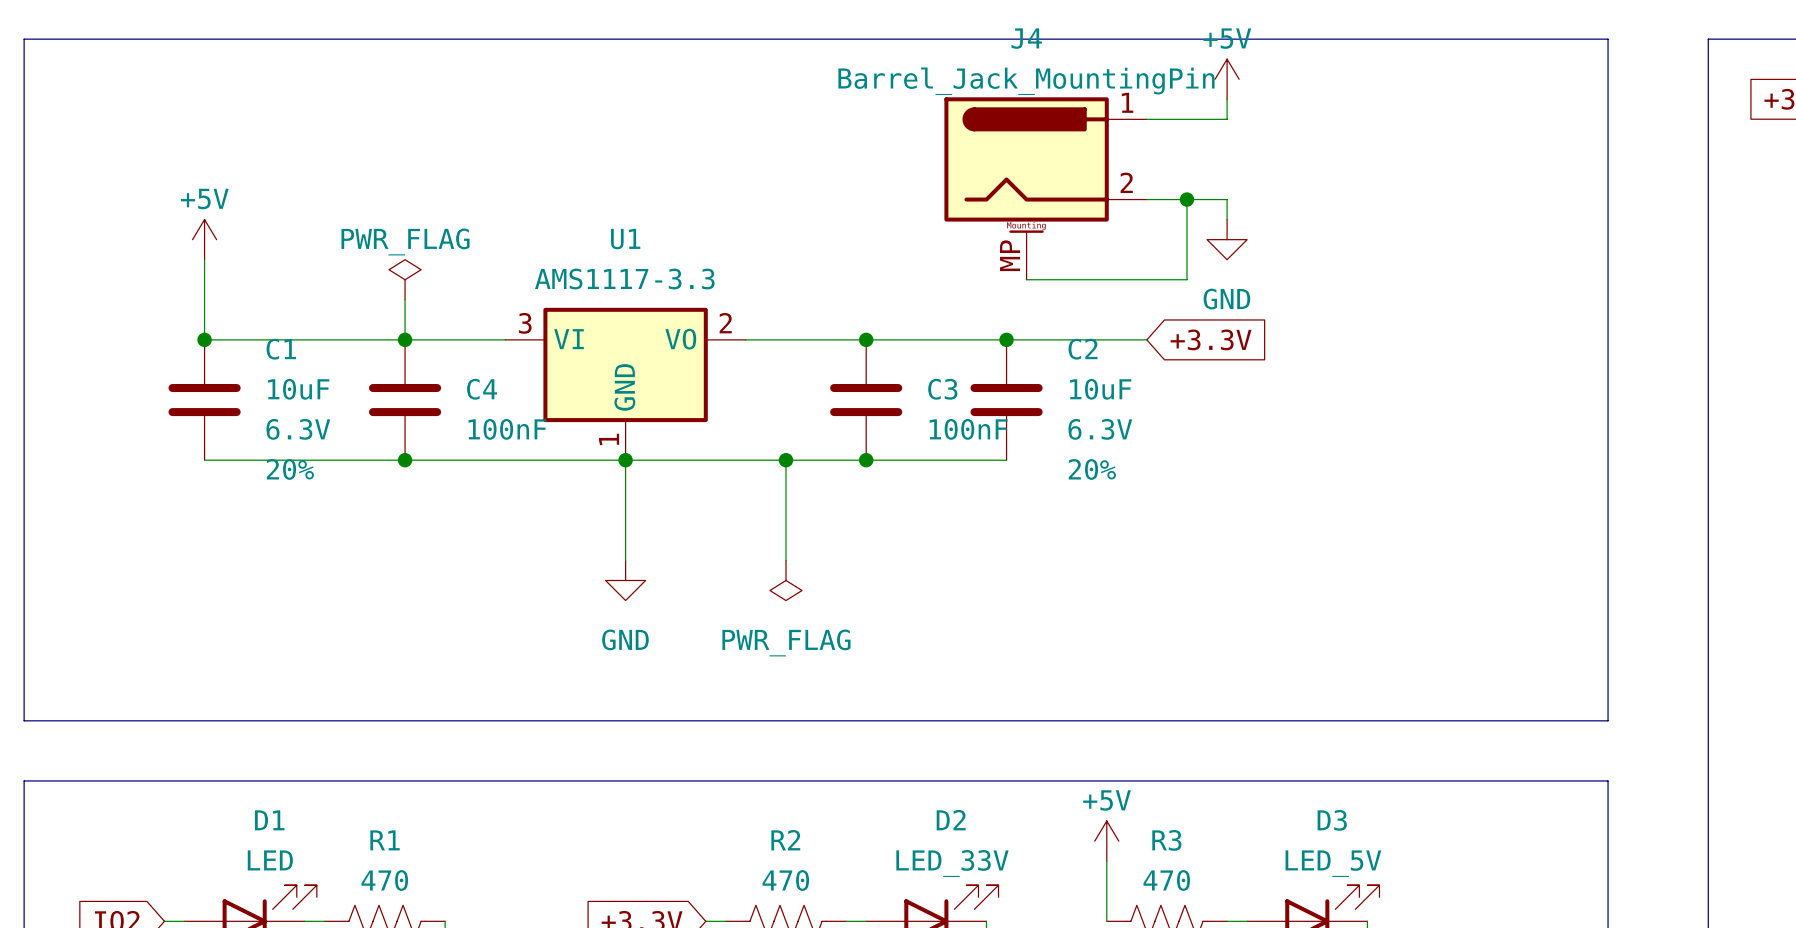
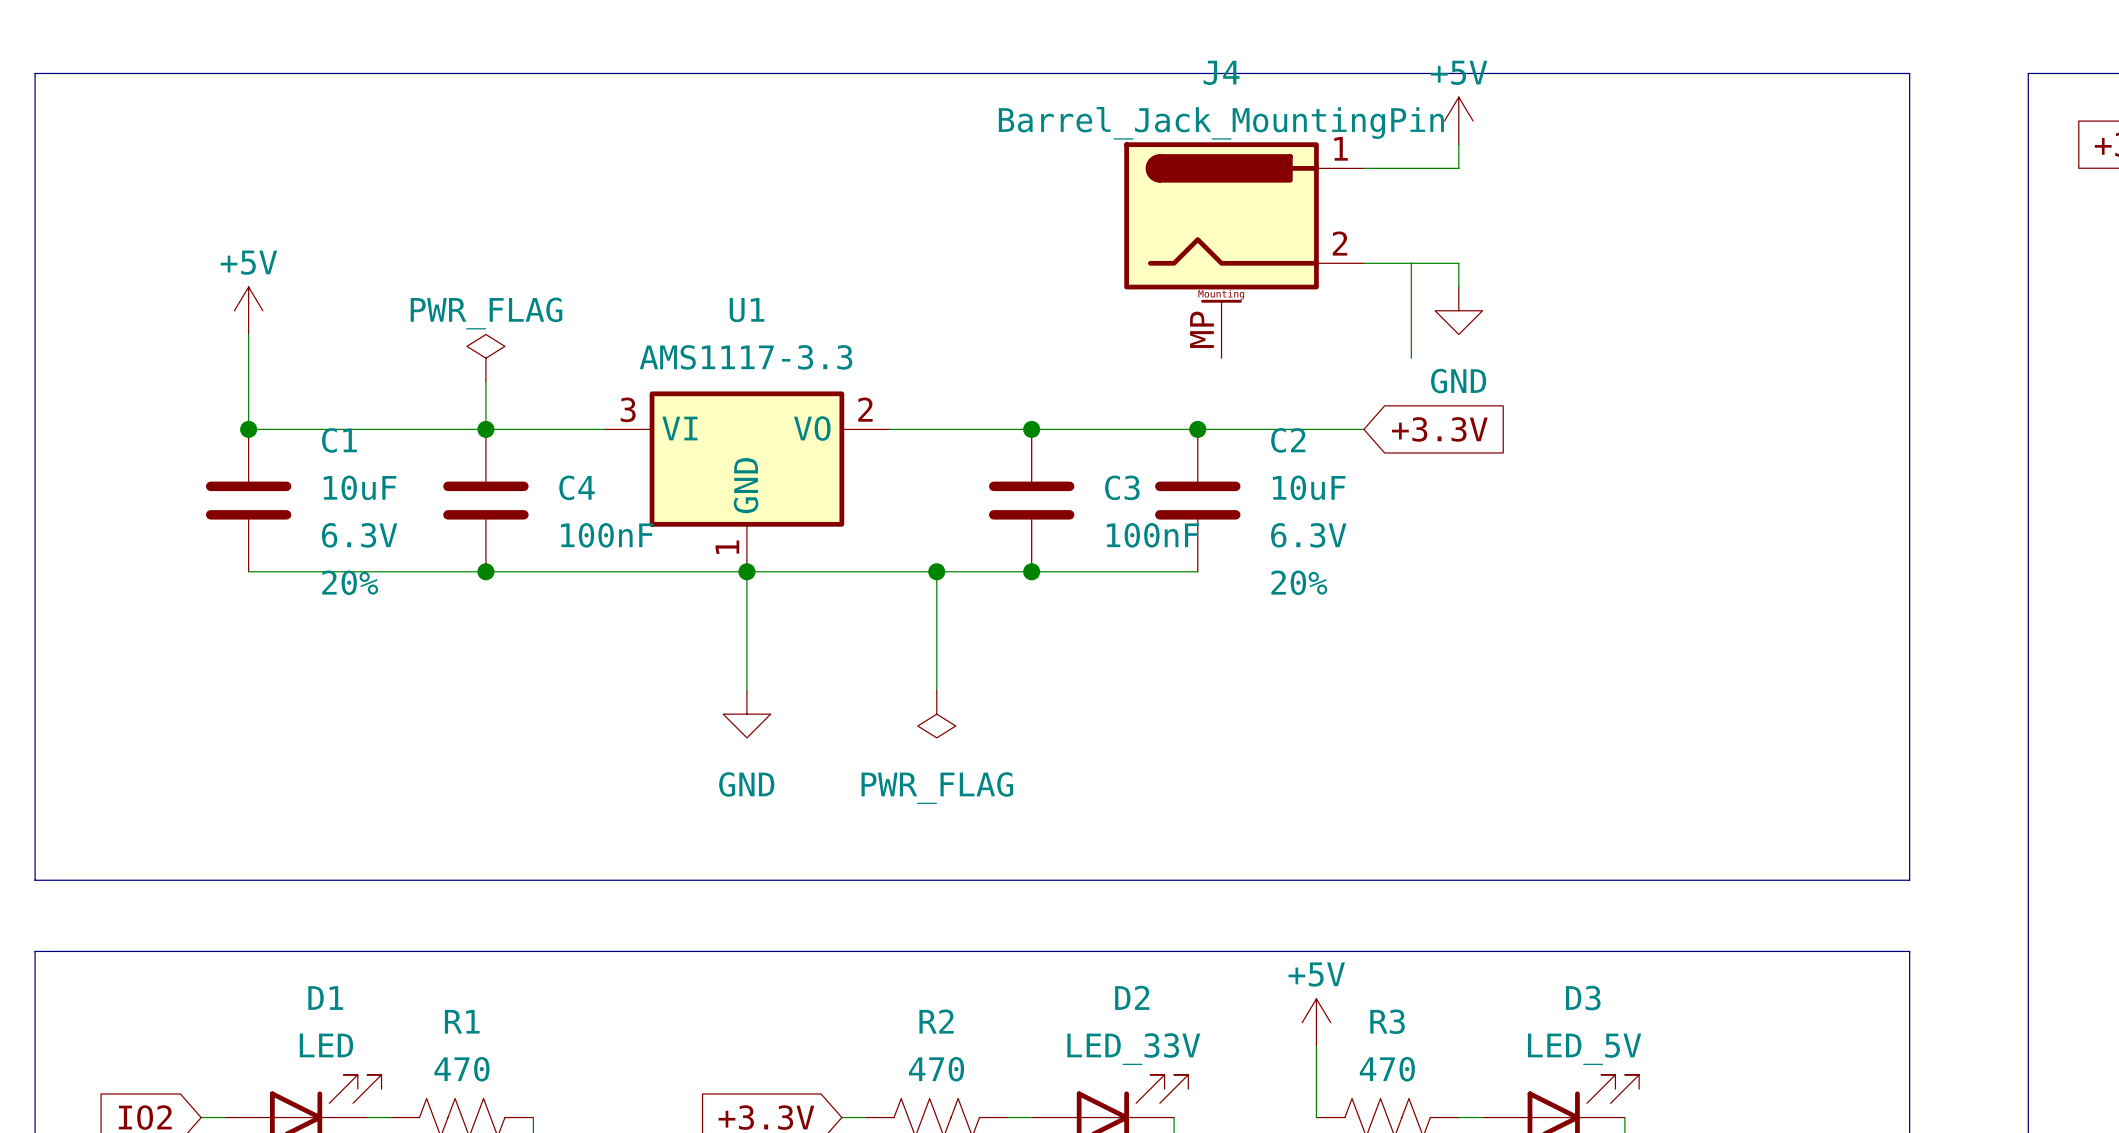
junction: (1186, 199) -> none
wire: (1026, 279) (1186, 279) -> none

